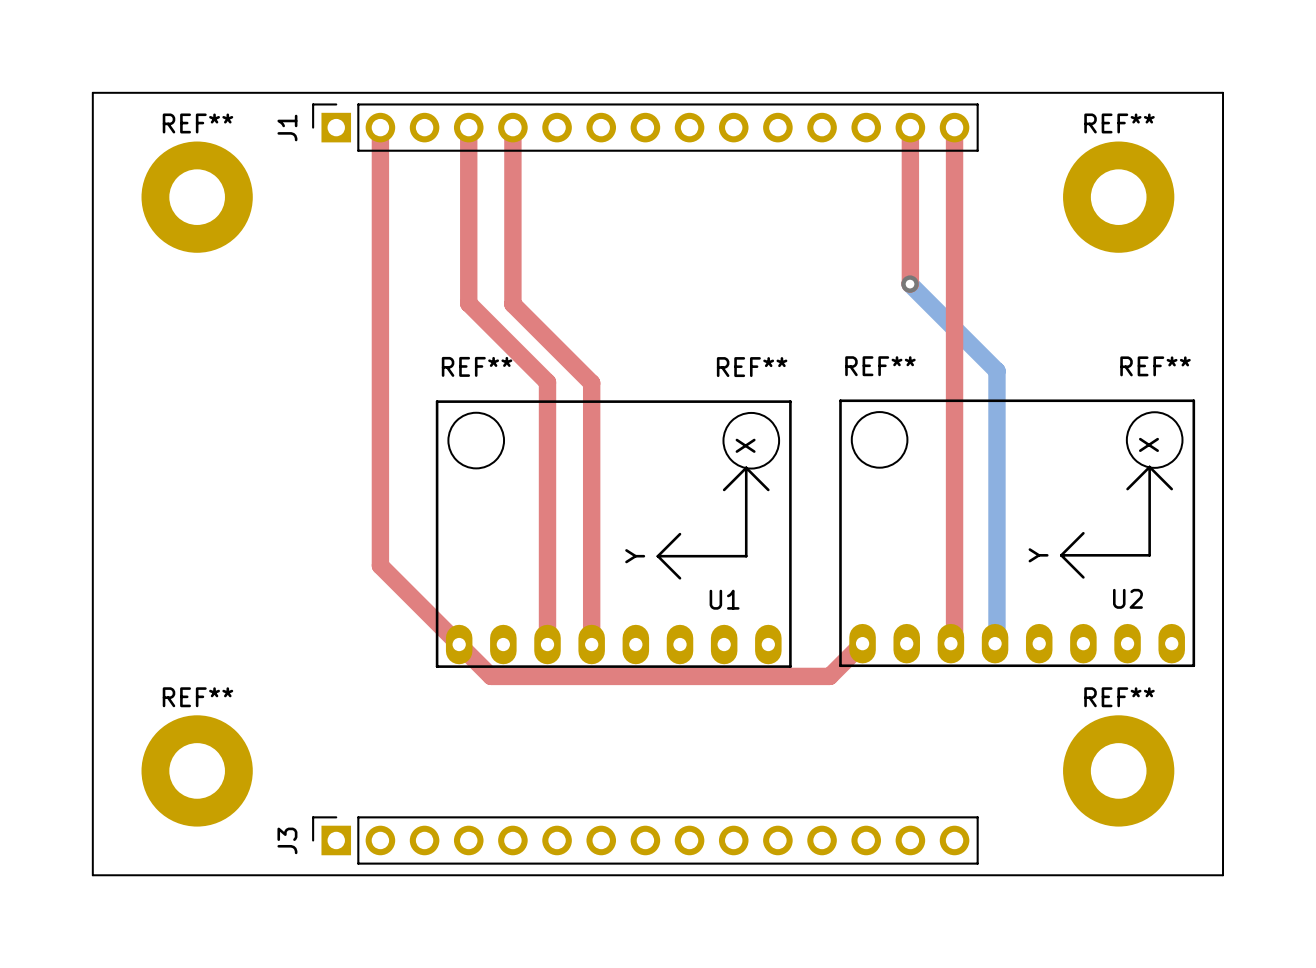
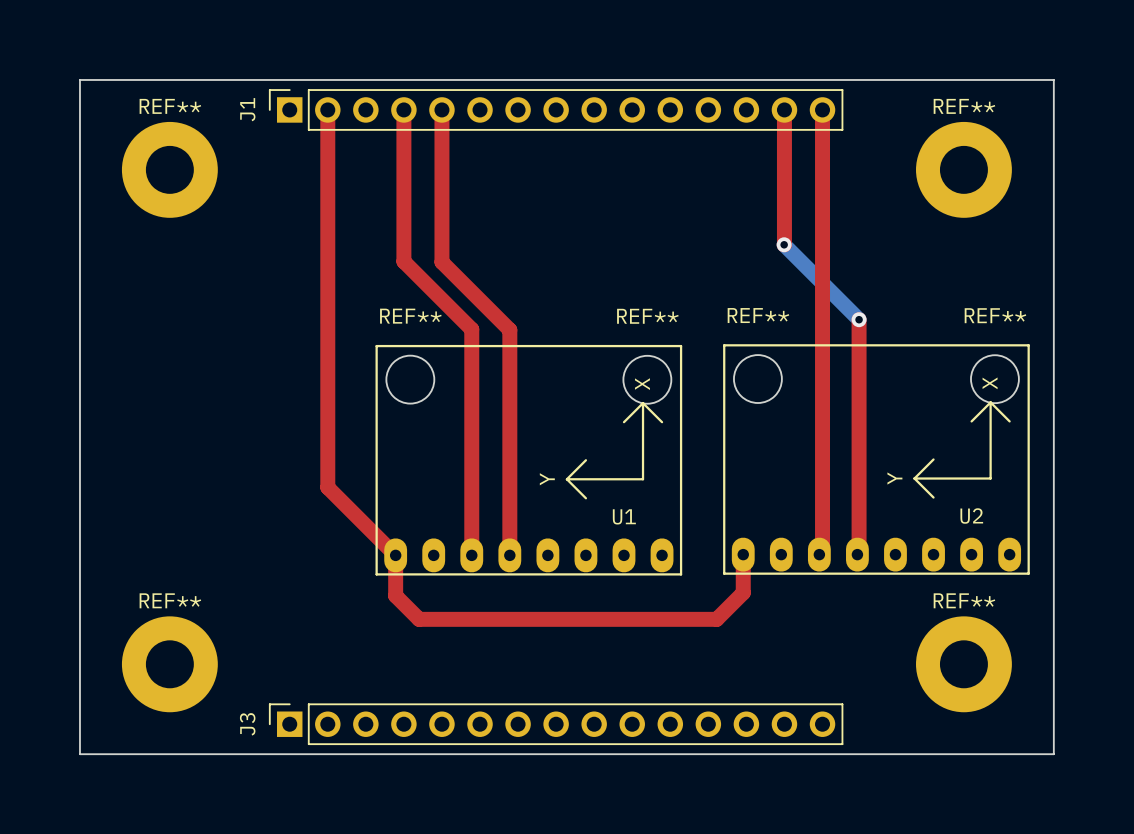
top track: none -> (859, 319) (859, 552) (857, 554)
bottom track: (996, 371) (996, 641) -> none
via: none -> (859, 319)
top track: (862, 643) (829, 676) (491, 676) (459, 644) -> (743, 554) (743, 592) (716, 619) (419, 619) (395, 595) (395, 555)

